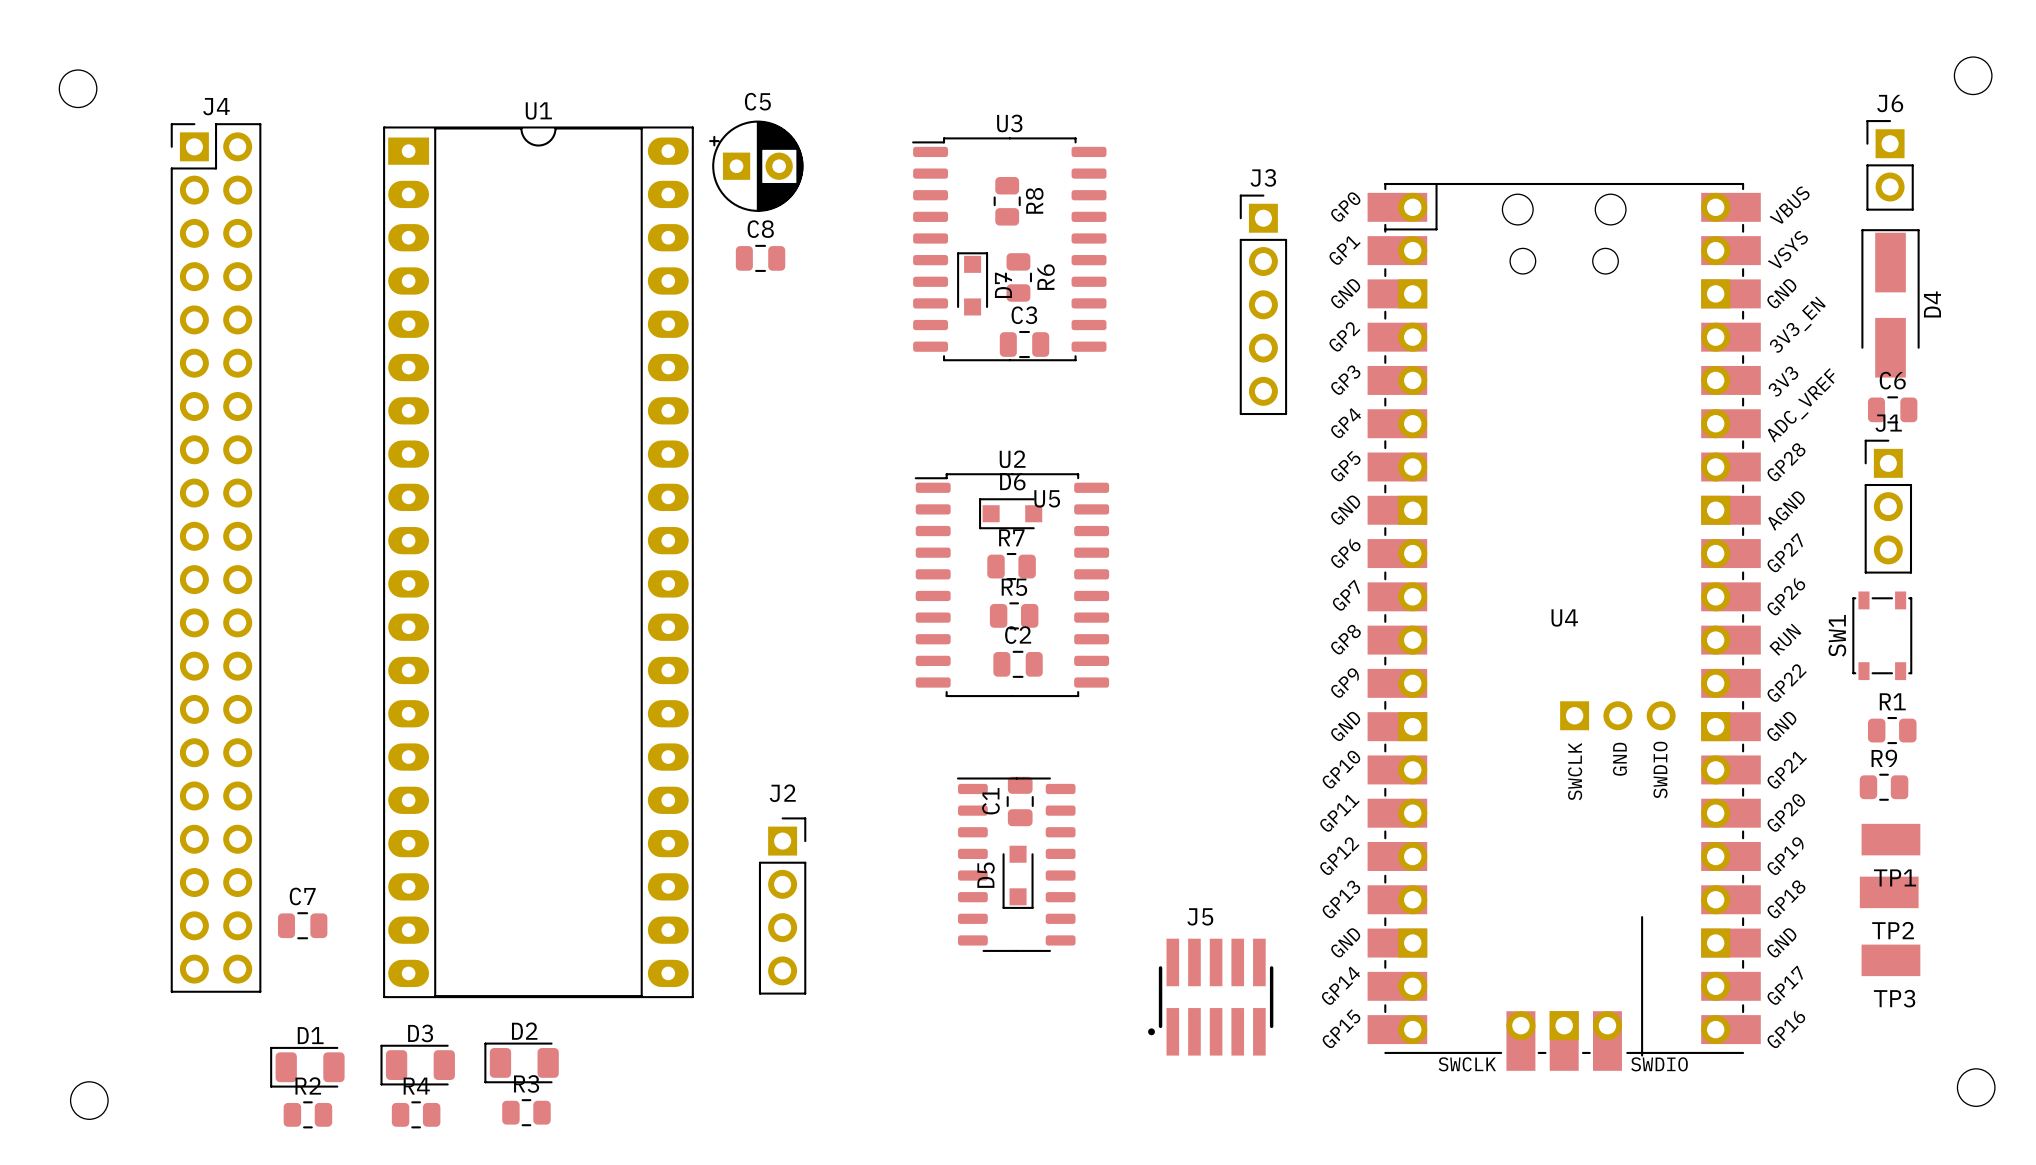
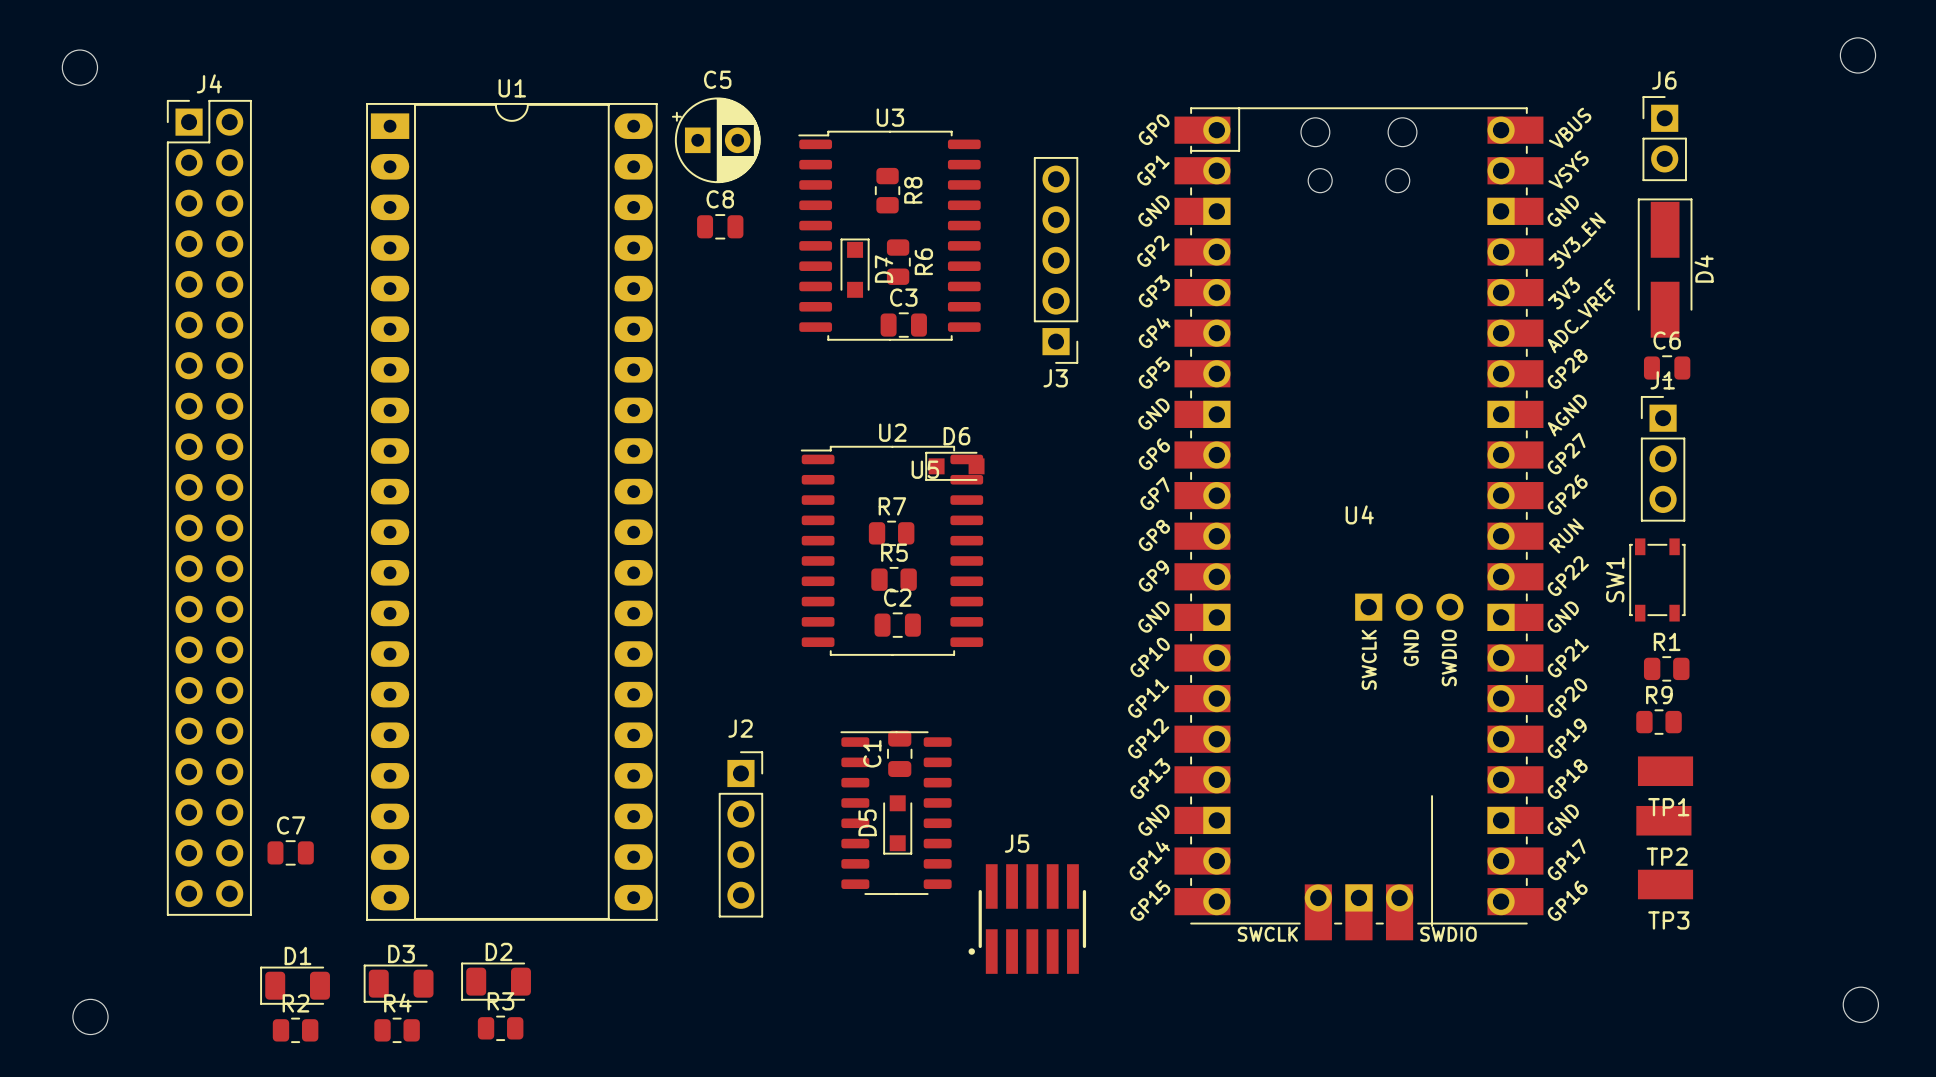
J6 position: (1890, 165) -> (1664, 138)
R8 position: (1007, 201) -> (887, 190)
U3 position: (1009, 249) -> (889, 235)
R6 position: (1018, 277) -> (898, 262)
D7 position: (972, 283) -> (855, 268)
D4 position: (1890, 303) -> (1665, 268)
J3 rotation: 0° (1263, 304) -> 180° (1056, 260)
J3 position: (1263, 304) -> (1056, 260)
C3 position: (1024, 344) -> (903, 325)
C6 position: (1892, 409) -> (1667, 368)
J1 position: (1888, 506) -> (1663, 458)
R7 position: (1011, 566) -> (891, 533)
U2 position: (1011, 585) -> (891, 550)
R5 position: (1014, 615) -> (894, 579)
U4 position: (1564, 626) -> (1358, 523)
SW1 position: (1882, 635) -> (1657, 579)
C2 position: (1018, 664) -> (897, 625)
R1 position: (1892, 730) -> (1666, 668)
R9 position: (1884, 787) -> (1659, 722)
C1 position: (1020, 801) -> (899, 753)
TP1 position: (1890, 839) -> (1665, 771)
U5 position: (1016, 864) -> (896, 813)
D5 position: (1018, 877) -> (897, 824)
TP2 position: (1889, 892) -> (1663, 820)
TP3 position: (1890, 960) -> (1665, 884)
J5 position: (1210, 997) -> (1027, 919)

